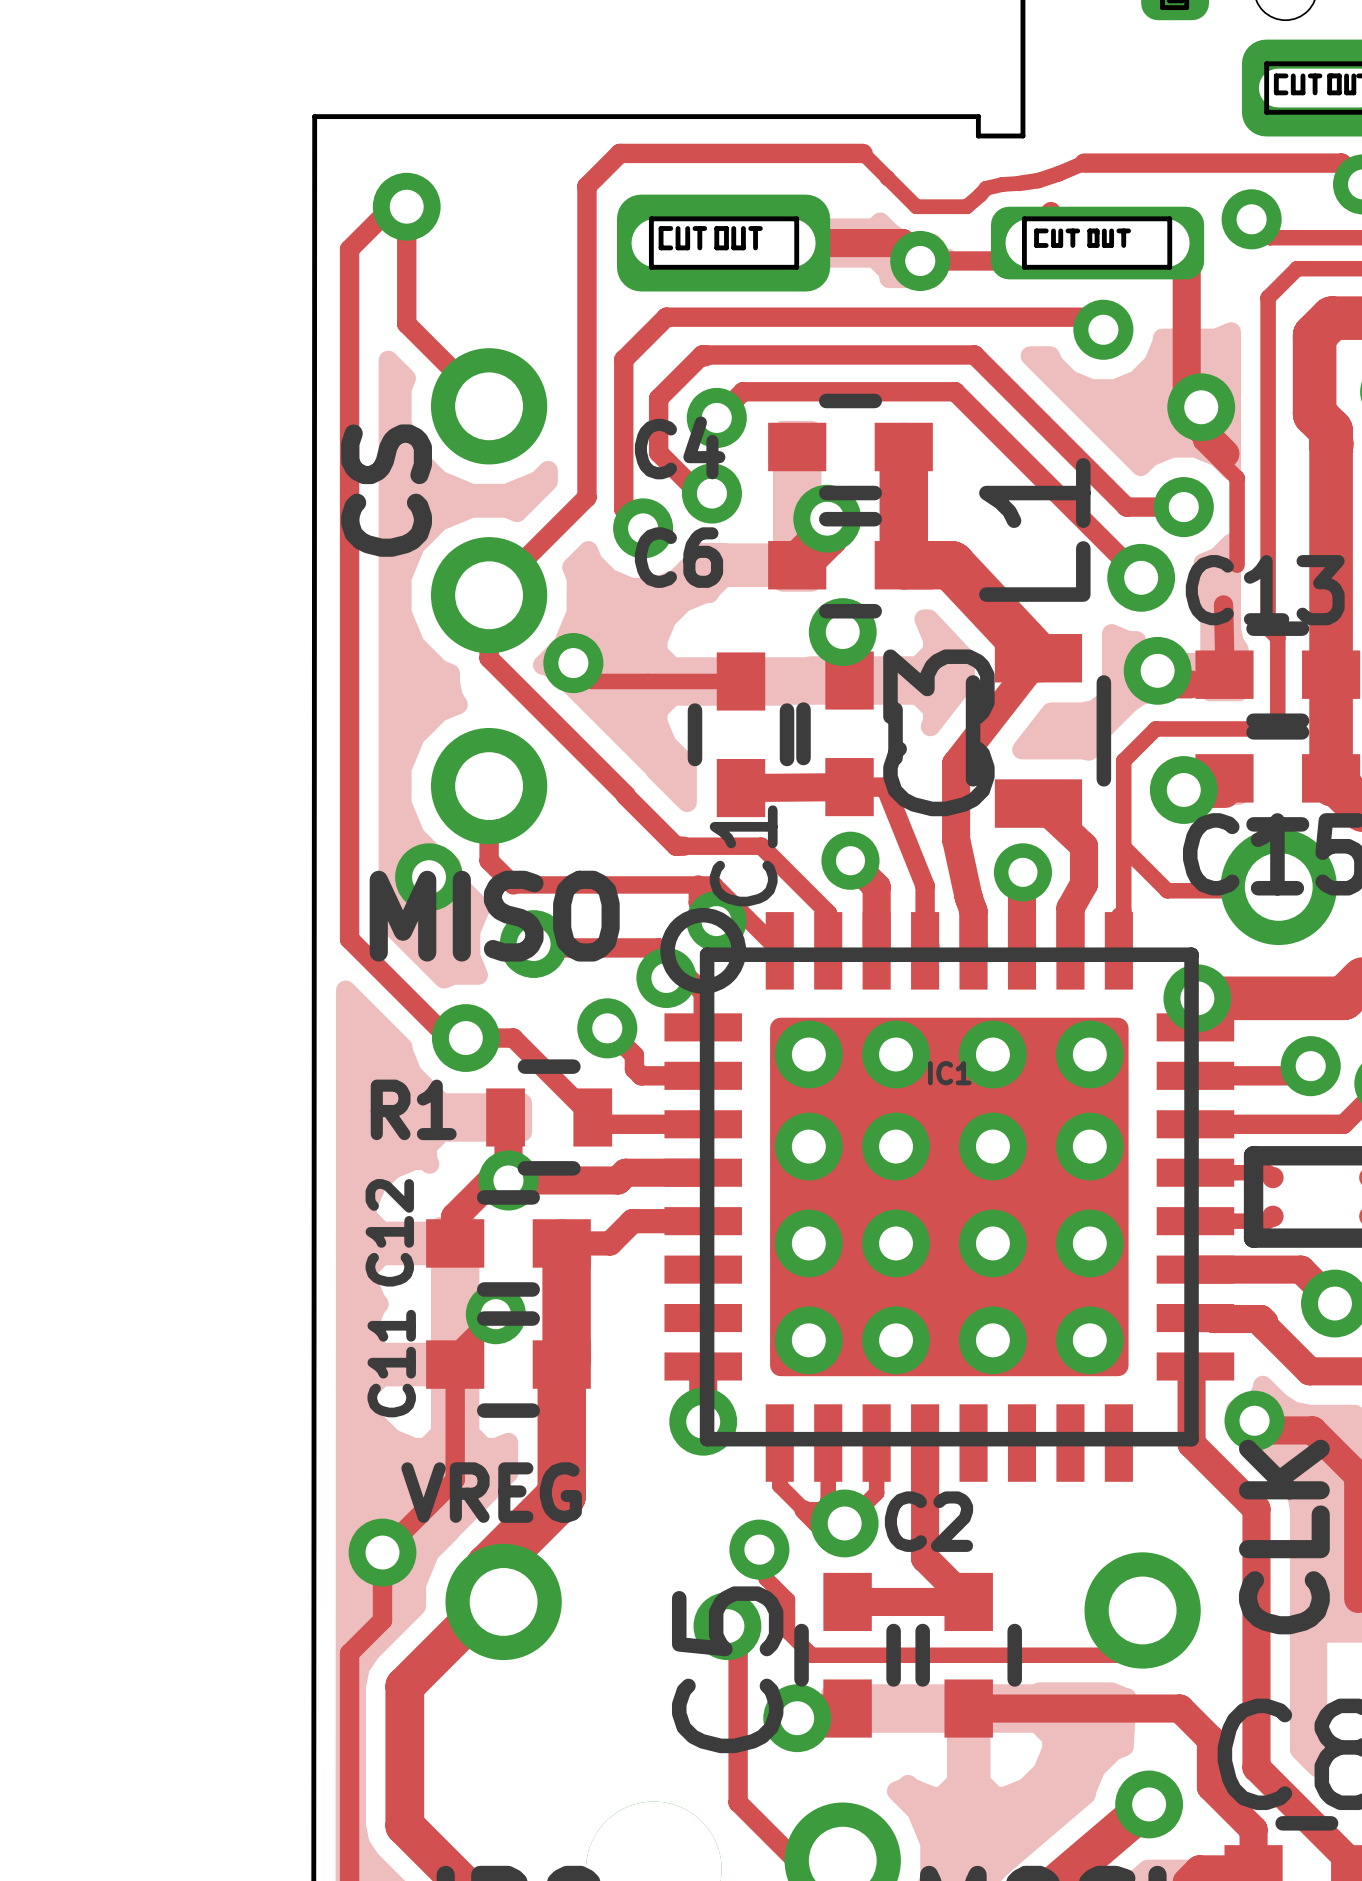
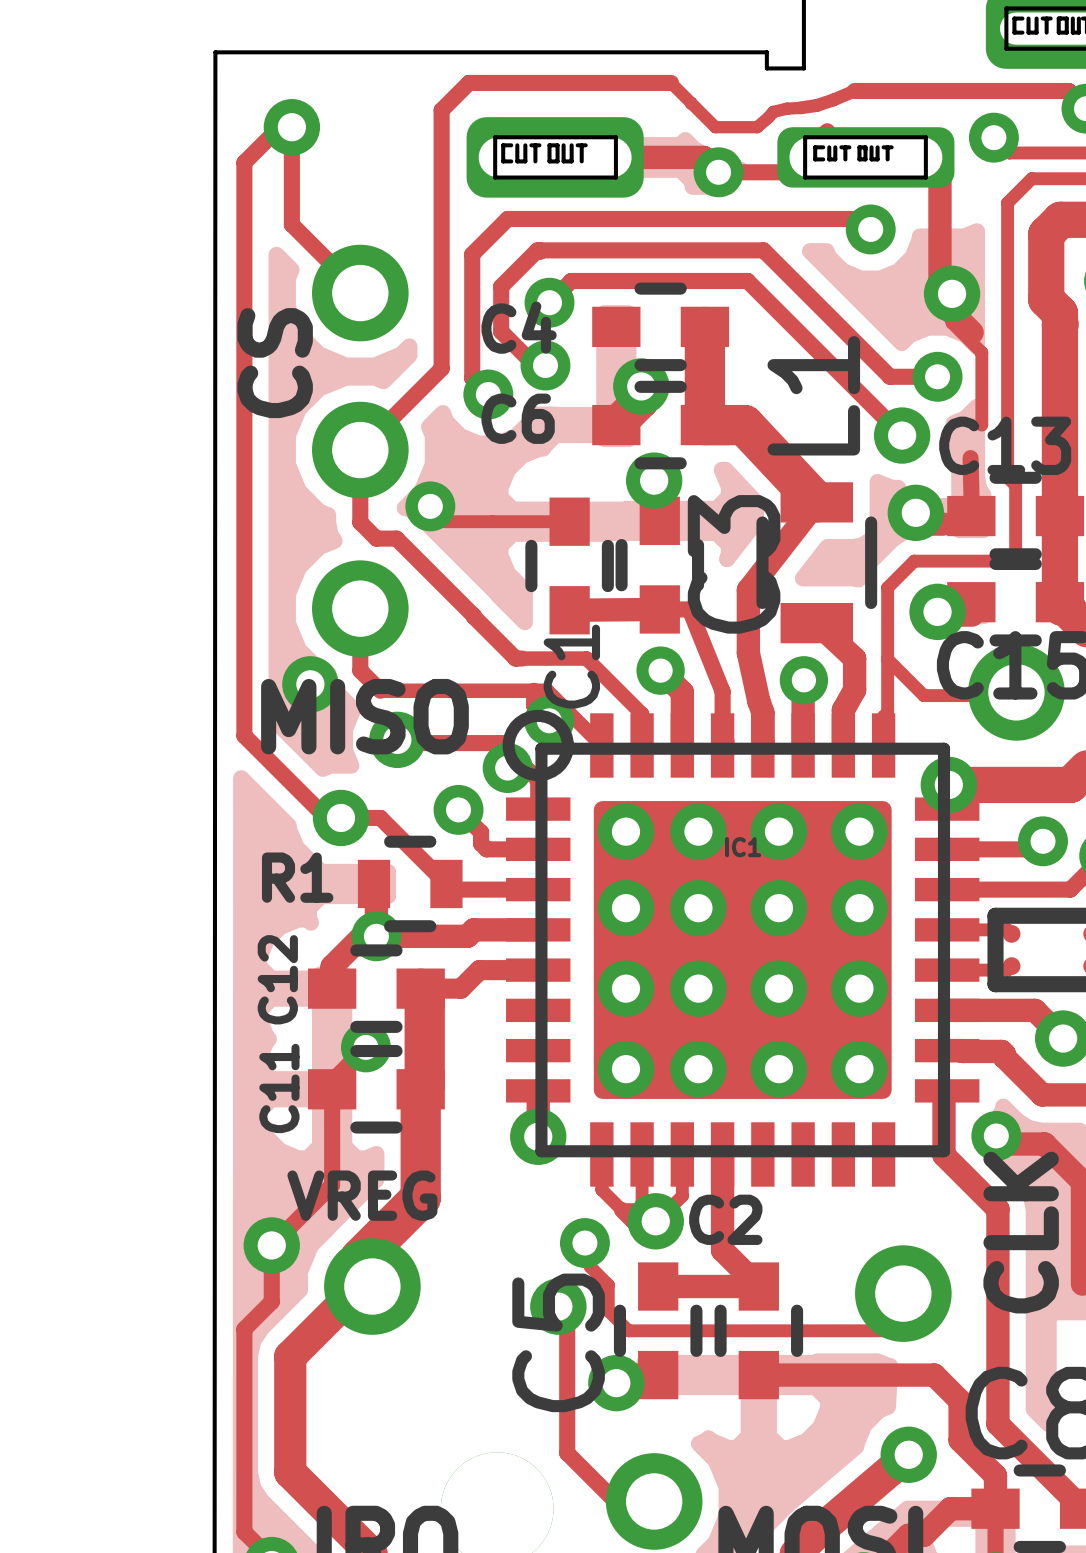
track: (489, 658) (532, 701) -> (360, 502) (360, 522) (376, 538) (396, 538)

